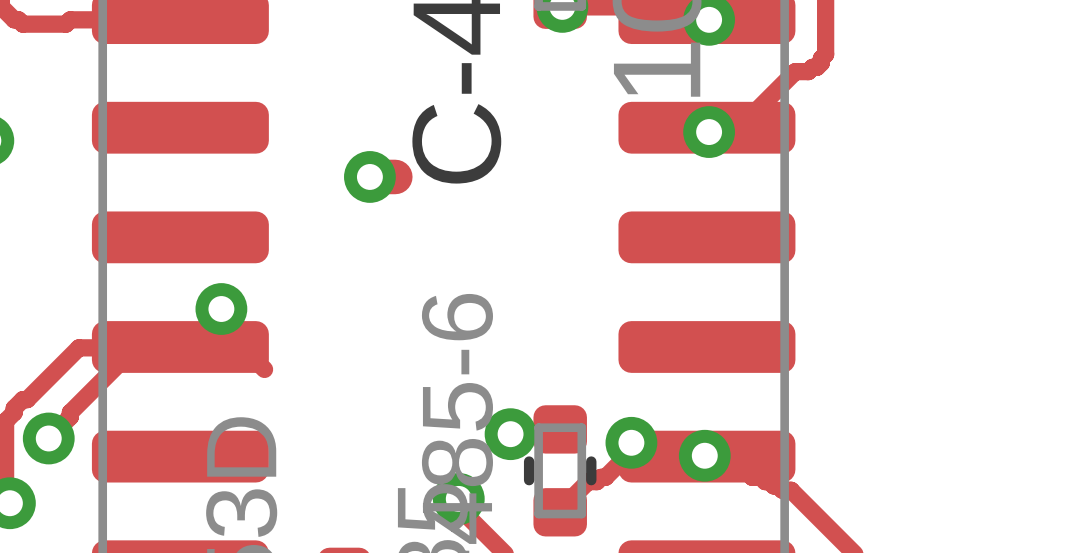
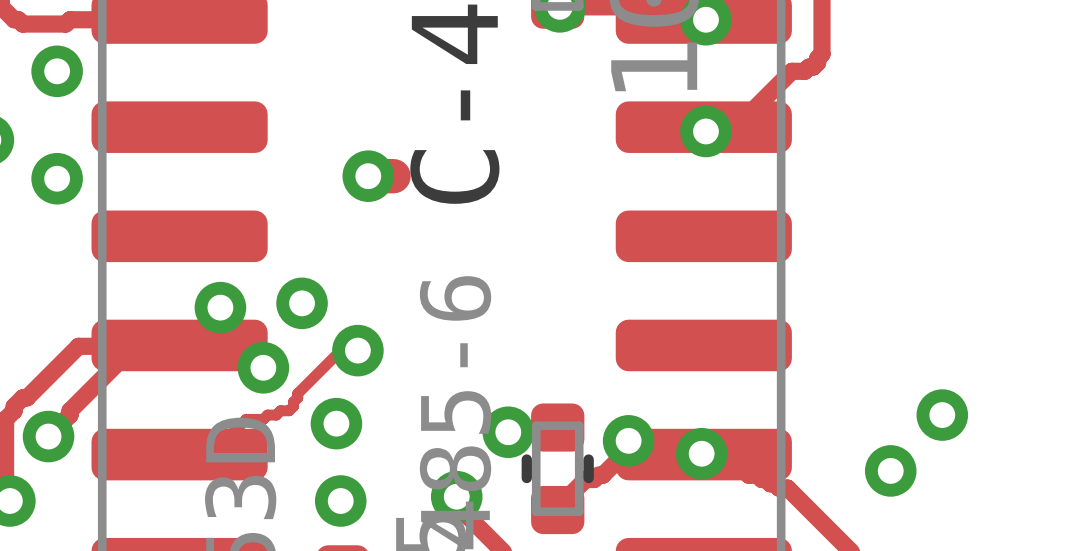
via: none -> (57, 71)
via: none -> (57, 178)
via: none -> (302, 303)
track: none -> (357, 350) (340, 350) (297, 393) (297, 397) (289, 410) (280, 410) (276, 415) (267, 415) (263, 419) (246, 419) (220, 445)
via: none -> (357, 350)
via: none -> (263, 367)
via: none -> (942, 415)
via: none -> (336, 423)
via: none -> (890, 470)
via: none -> (340, 501)

